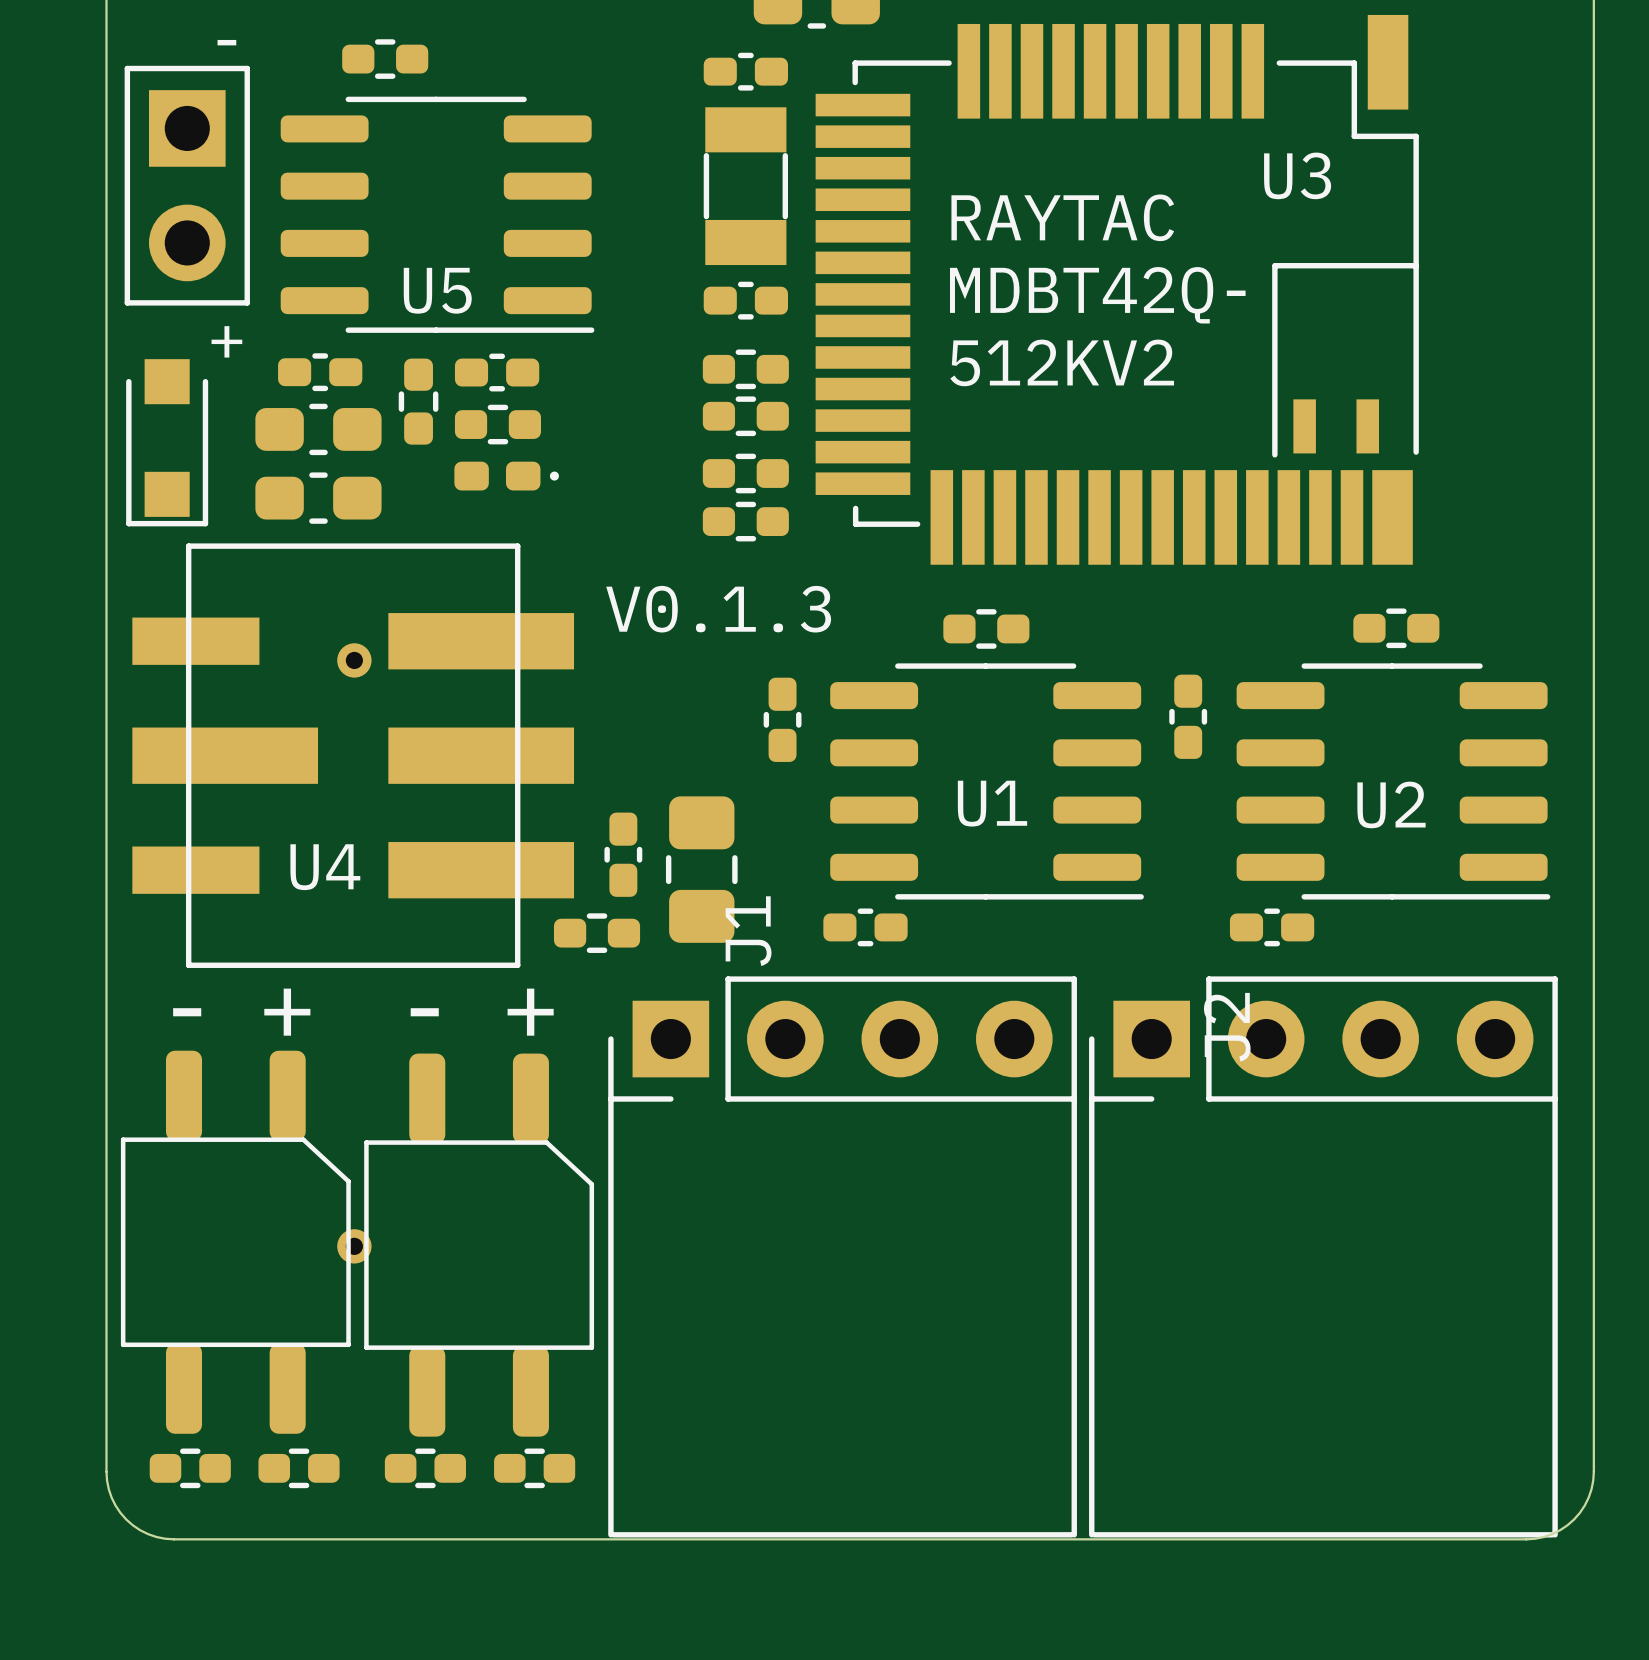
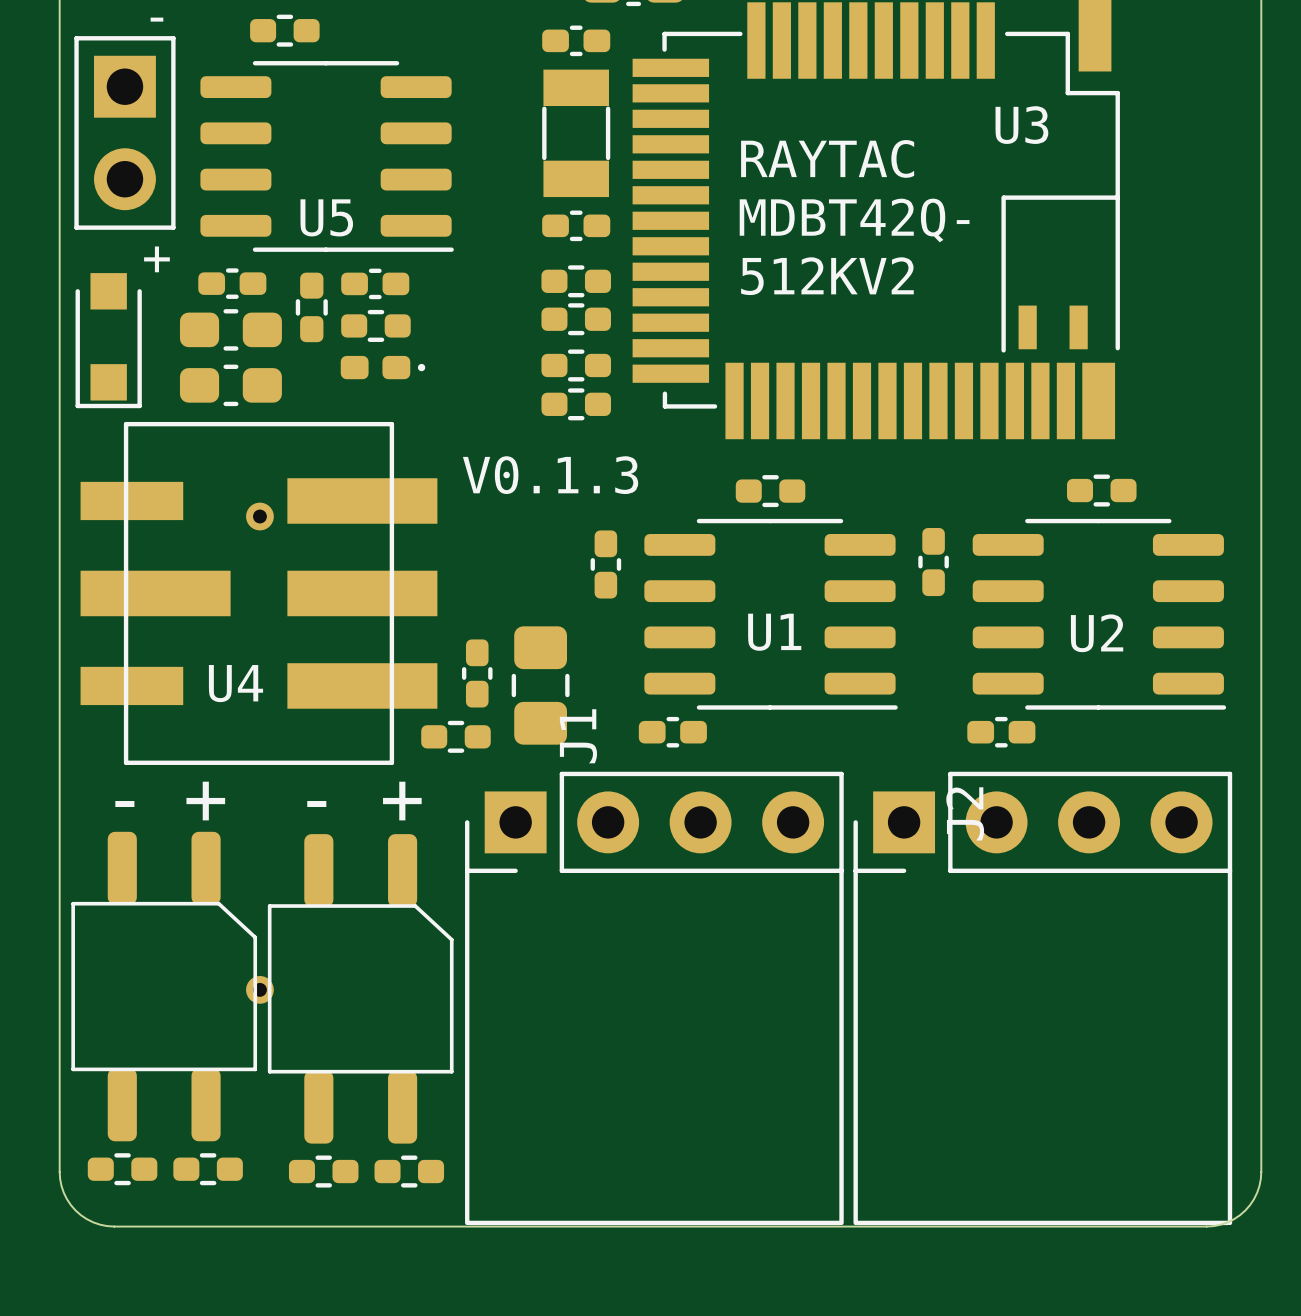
part footprint: [149, 1448, 231, 1489] -> [87, 1153, 158, 1186]
part footprint: [258, 1448, 340, 1489] -> [173, 1153, 243, 1186]
part footprint: [384, 1448, 466, 1489] -> [288, 1155, 359, 1188]
part footprint: [494, 1448, 576, 1489] -> [374, 1155, 445, 1188]

